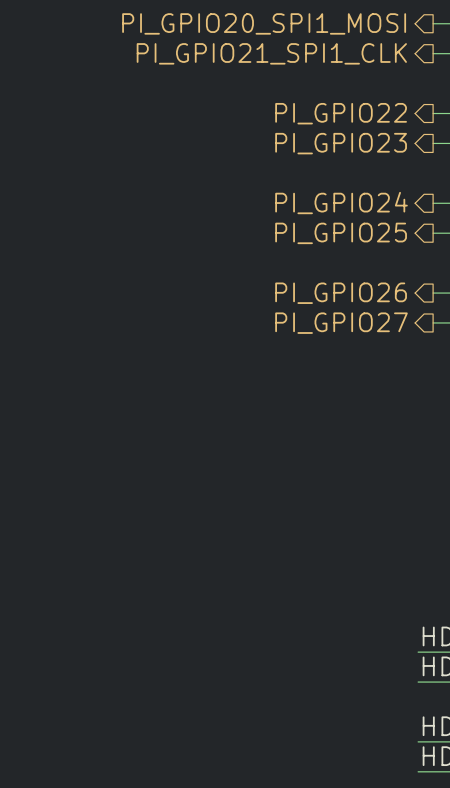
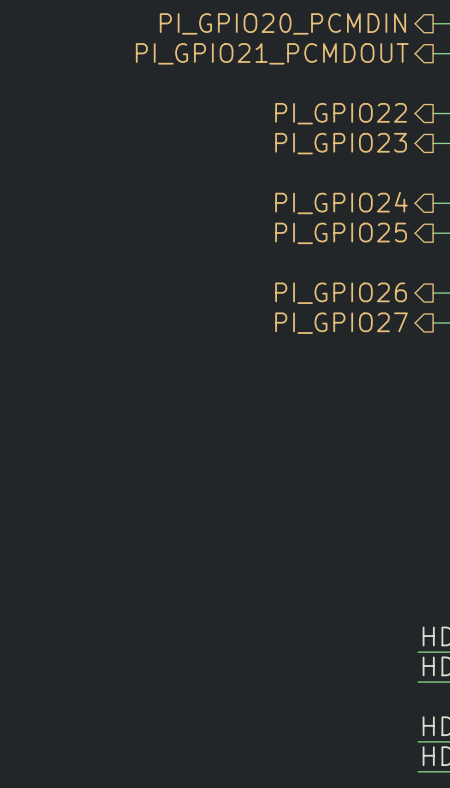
hierarchical label: PI_GPIO20_SPI1_MOSI (264, 23) -> PI_GPIO20_PCMDIN (282, 23)
hierarchical label: PI_GPIO21_SPI1_CLK (271, 53) -> PI_GPIO21_PCMDOUT (272, 53)

